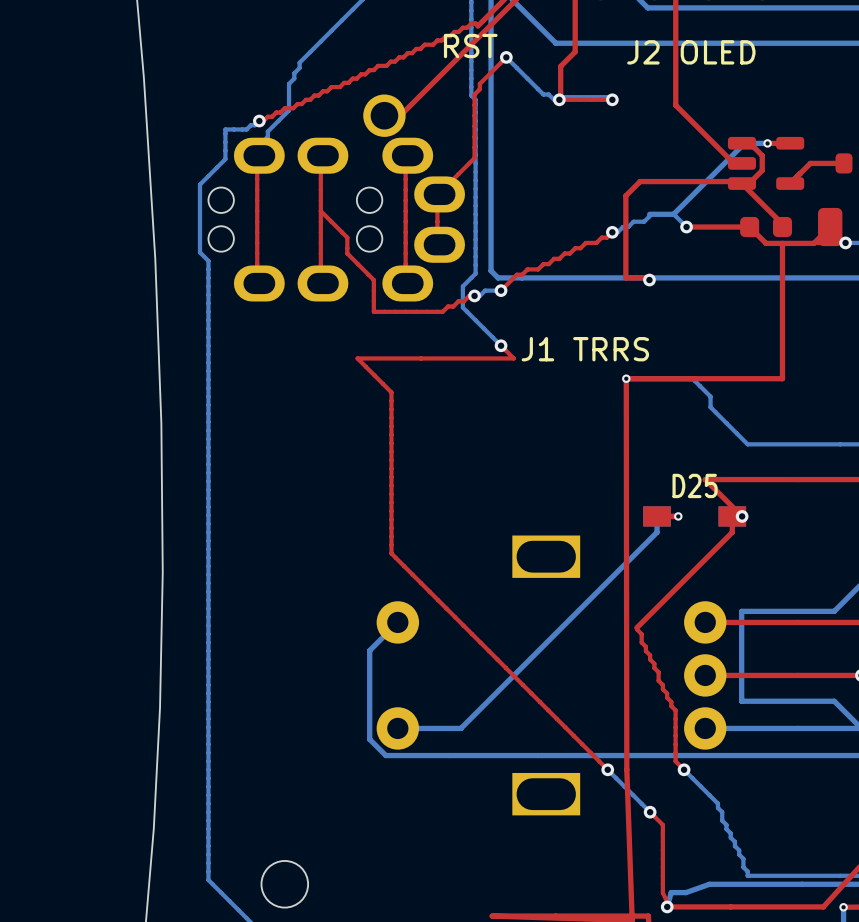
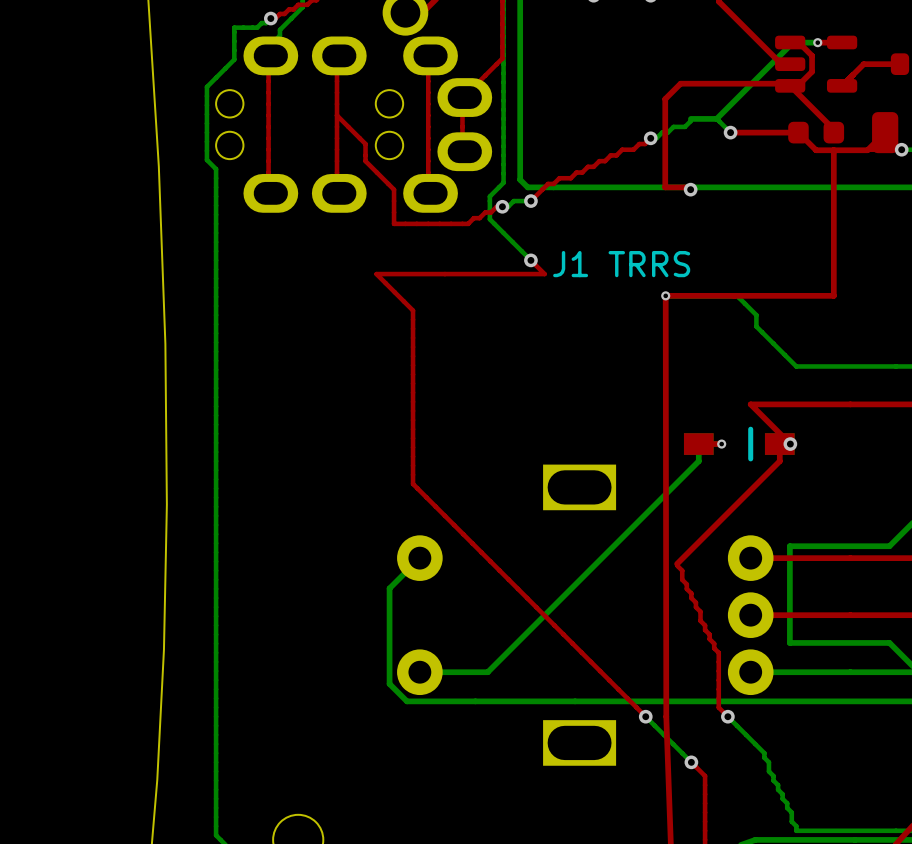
text: D25 (695, 485) -> none
part footprint: [643, 506, 747, 527] -> [683, 426, 795, 462]

